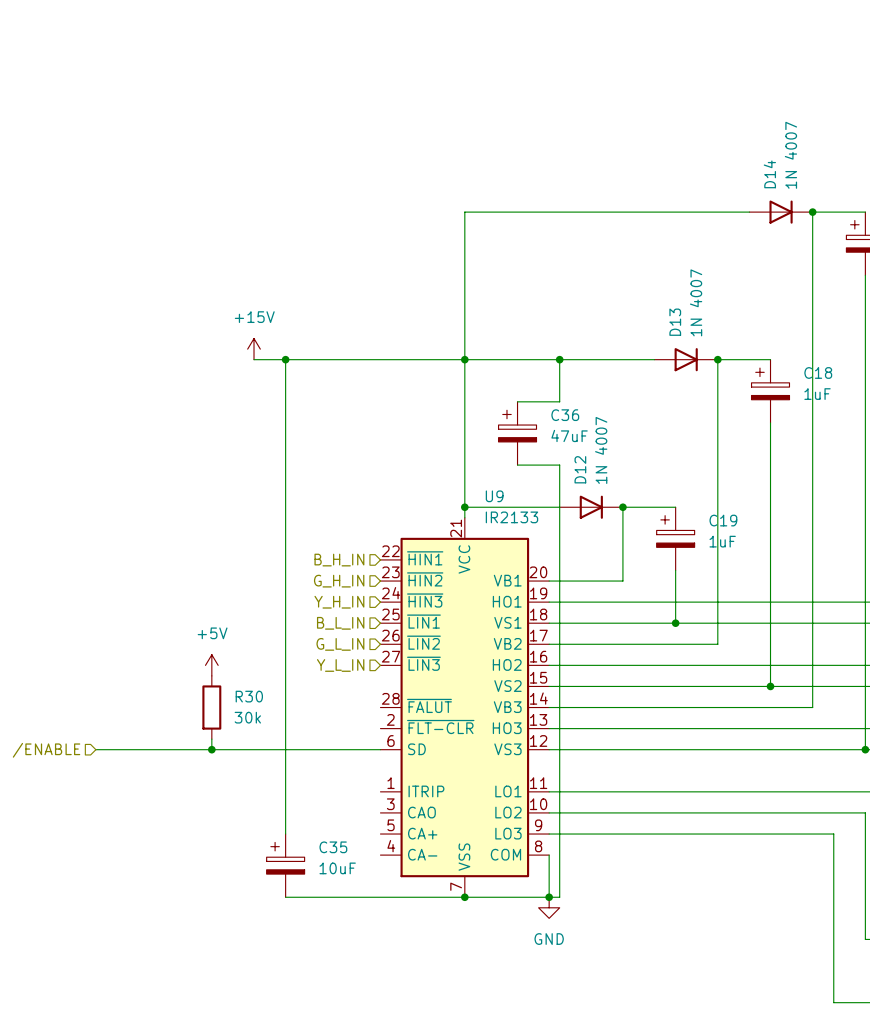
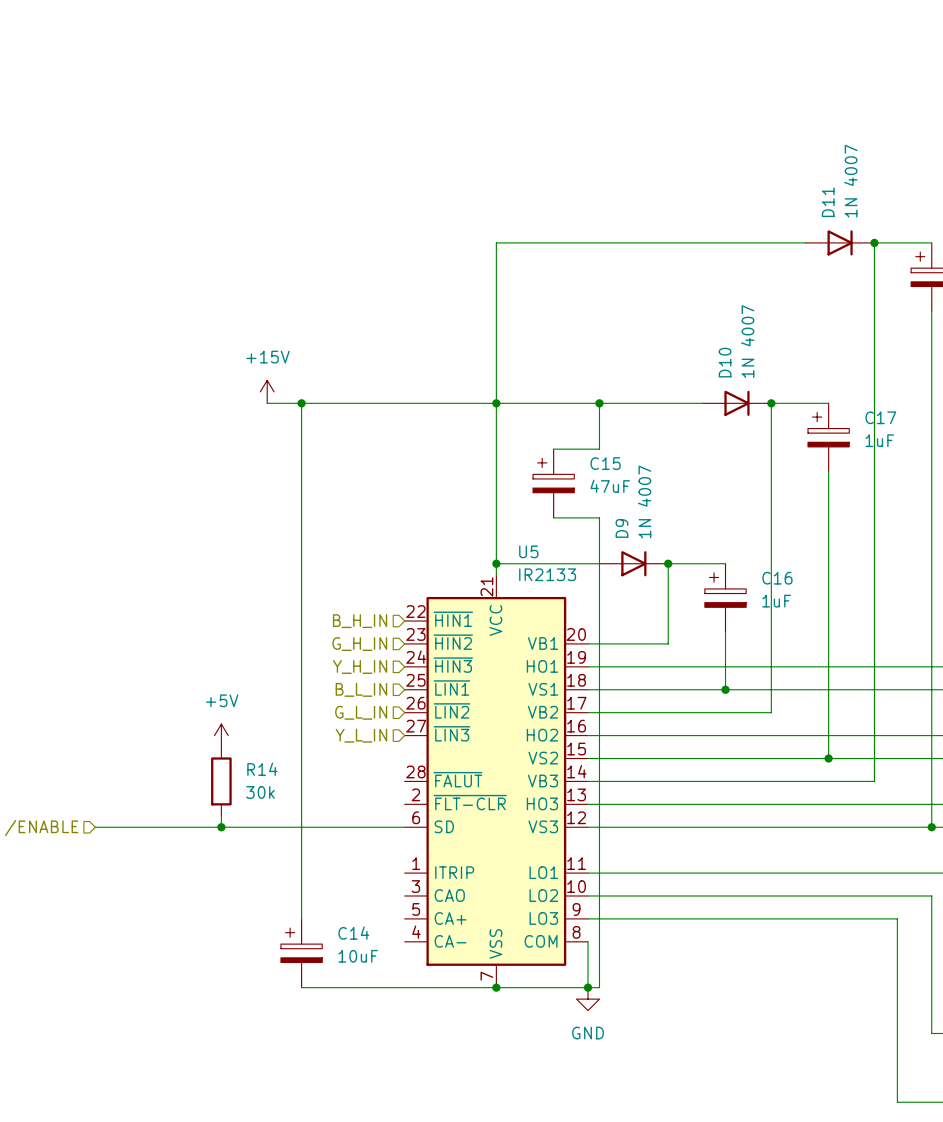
D14 name: D14 (769, 174) -> D11 (828, 202)
D13 name: D13 (675, 322) -> D10 (725, 362)
C18 name: C18 (818, 372) -> C17 (880, 417)
C36 name: C36 (565, 415) -> C15 (605, 463)
D12 name: D12 (580, 469) -> D9 (621, 528)
U9 name: U9 (494, 496) -> U5 (528, 551)
C19 name: C19 (723, 520) -> C16 (777, 578)
R30 name: R30 (249, 696) -> R14 (262, 769)
C35 name: C35 (333, 847) -> C14 (353, 933)

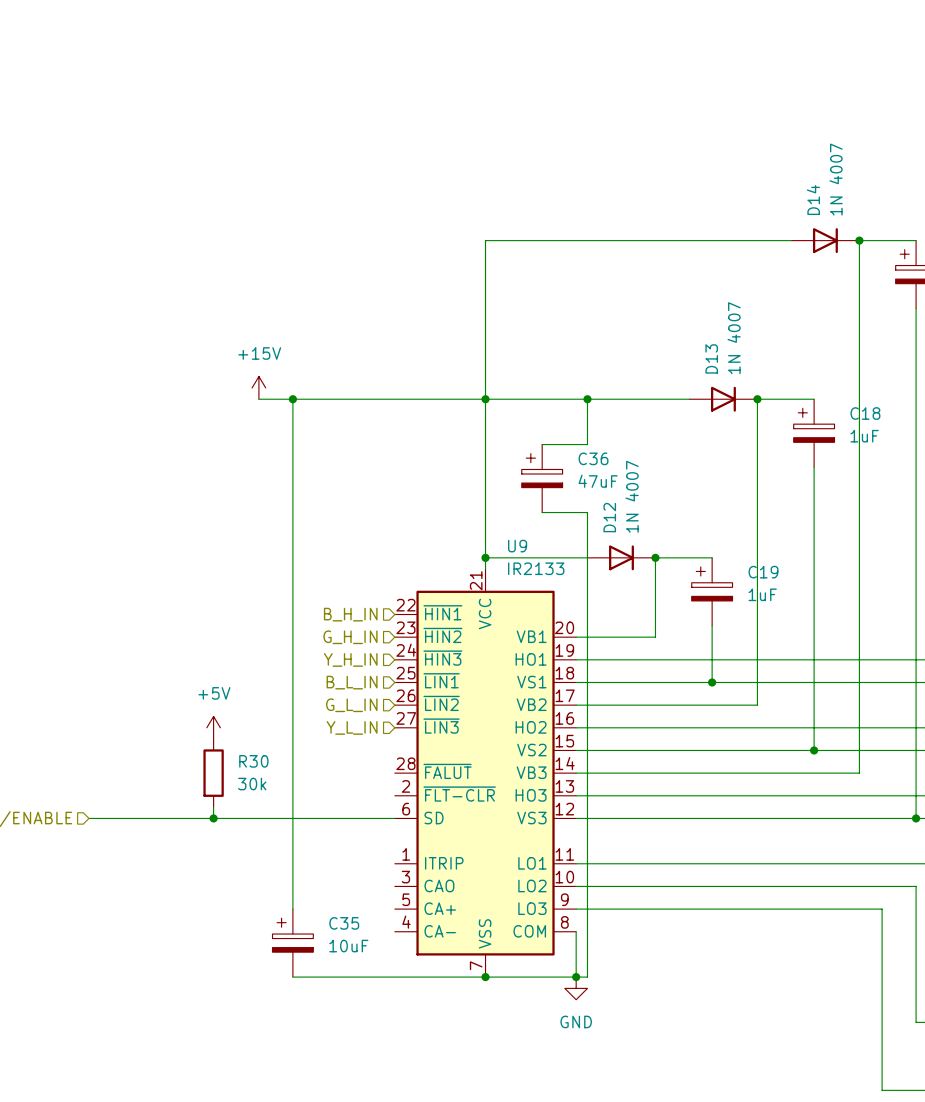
D11 name: D11 (828, 202) -> D14 (813, 200)
D10 name: D10 (725, 362) -> D13 (711, 358)
C17 name: C17 (880, 417) -> C18 (865, 413)
C15 name: C15 (605, 463) -> C36 (593, 458)
D9 name: D9 (621, 528) -> D12 (609, 517)
U5 name: U5 (528, 551) -> U9 (517, 546)
C16 name: C16 (777, 578) -> C19 (763, 572)
R14 name: R14 (262, 769) -> R30 (253, 761)
C14 name: C14 (353, 933) -> C35 (344, 923)

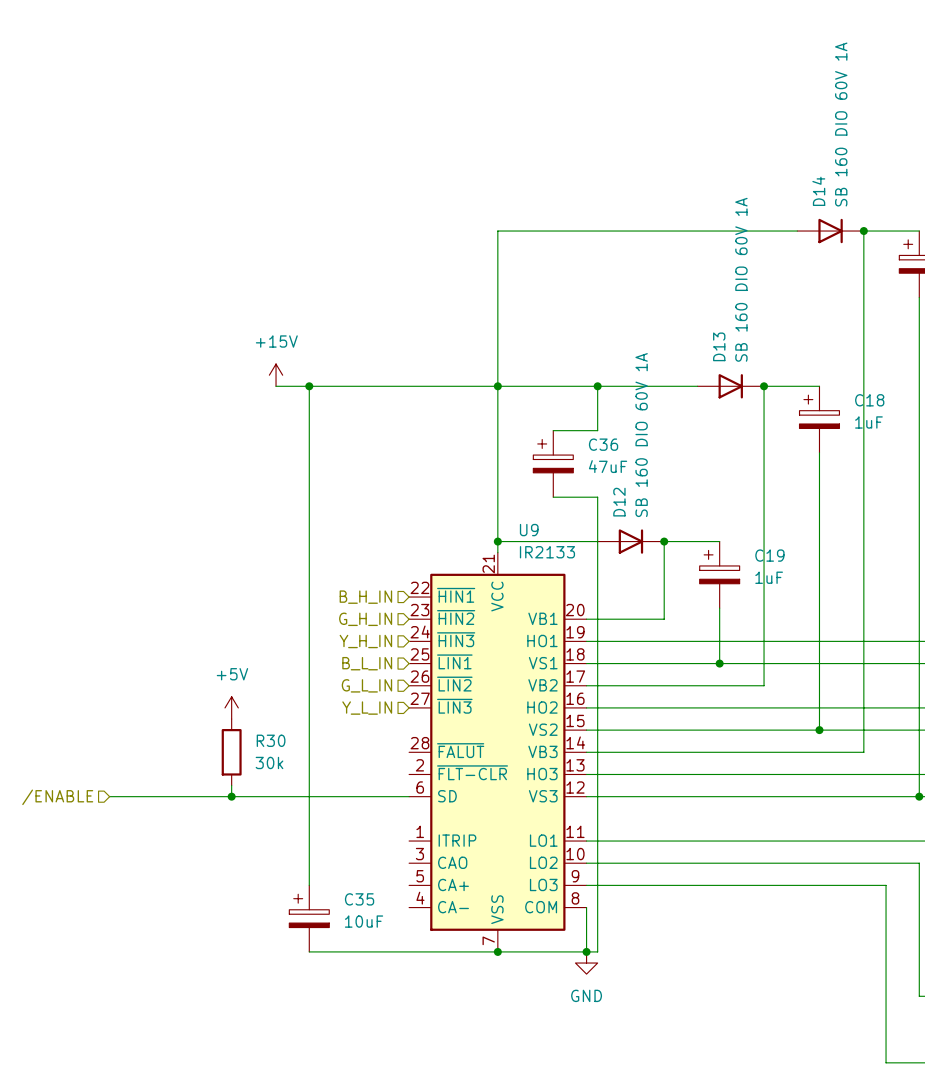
D14 value: 1N 4007 (836, 179) -> SB 160 DIO 60V 1A (841, 124)
D13 value: 1N 4007 (734, 338) -> SB 160 DIO 60V 1A (741, 279)
D12 value: 1N 4007 (632, 496) -> SB 160 DIO 60V 1A (641, 435)

